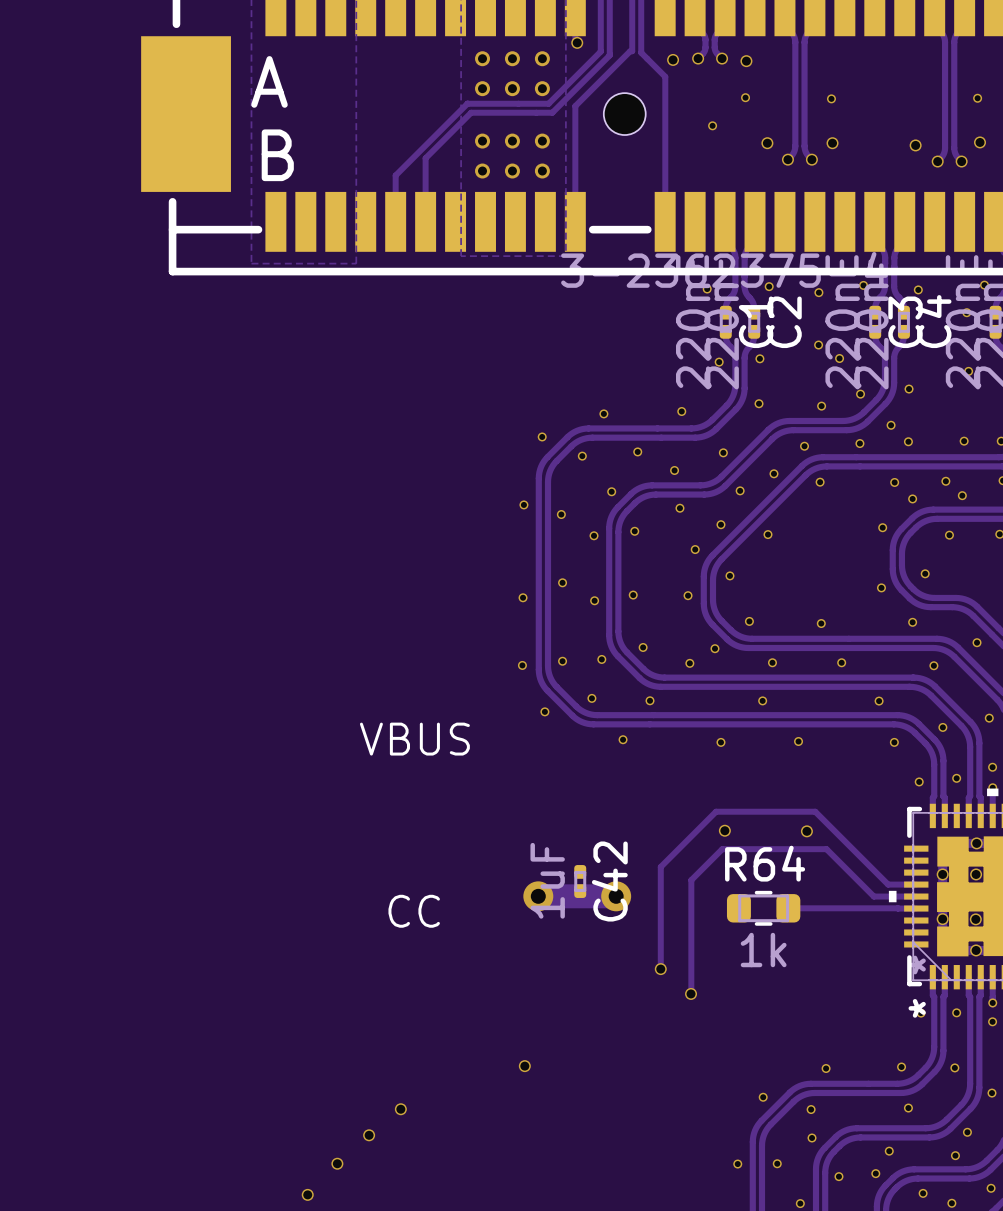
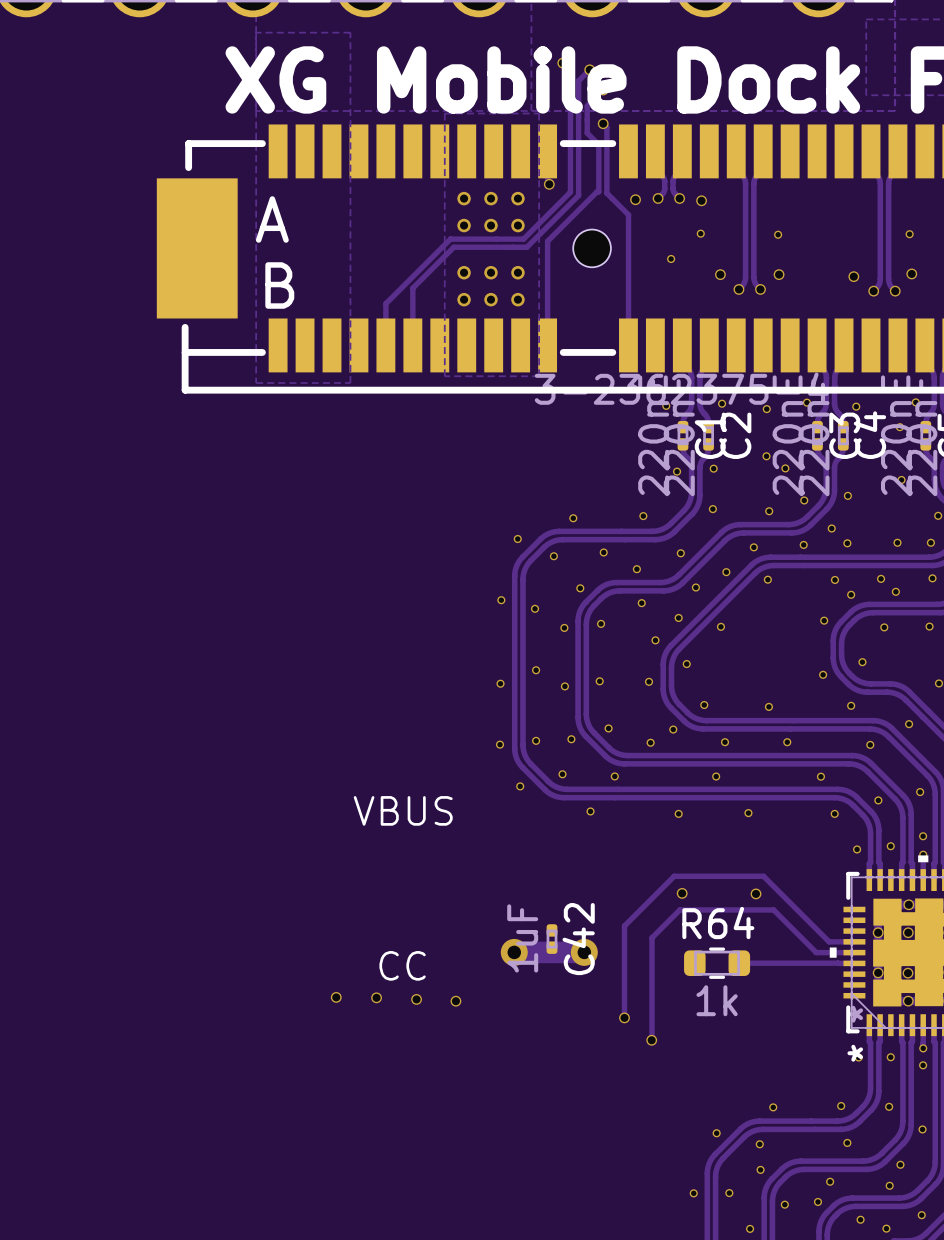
via: none -> (336, 997)
via: none -> (376, 997)
via: none -> (416, 999)
via: none -> (455, 1001)
via: (524, 1066) -> none
via: (400, 1109) -> none
via: (369, 1135) -> none
via: (337, 1163) -> none
via: (307, 1194) -> none

